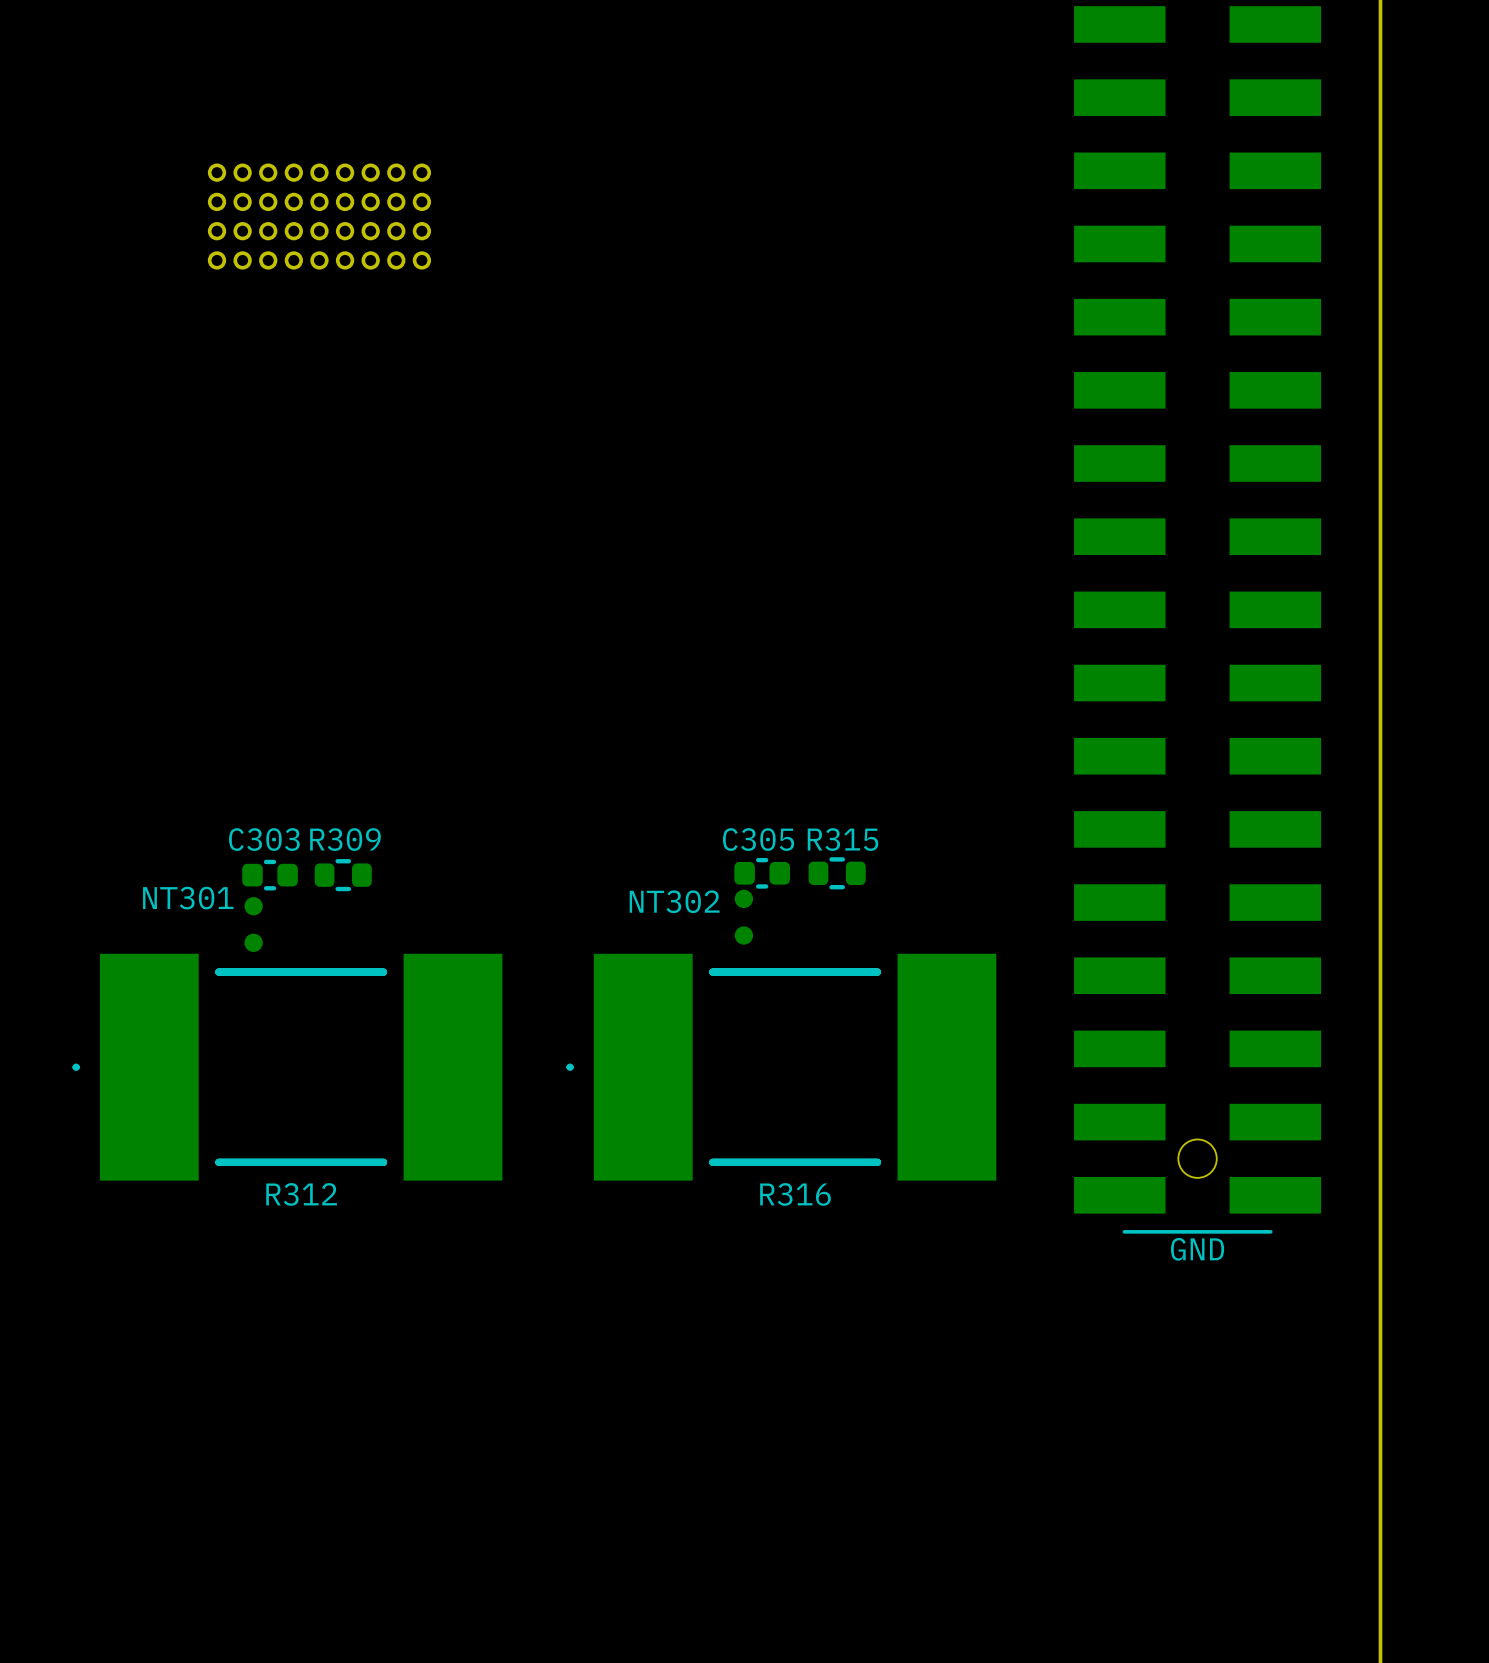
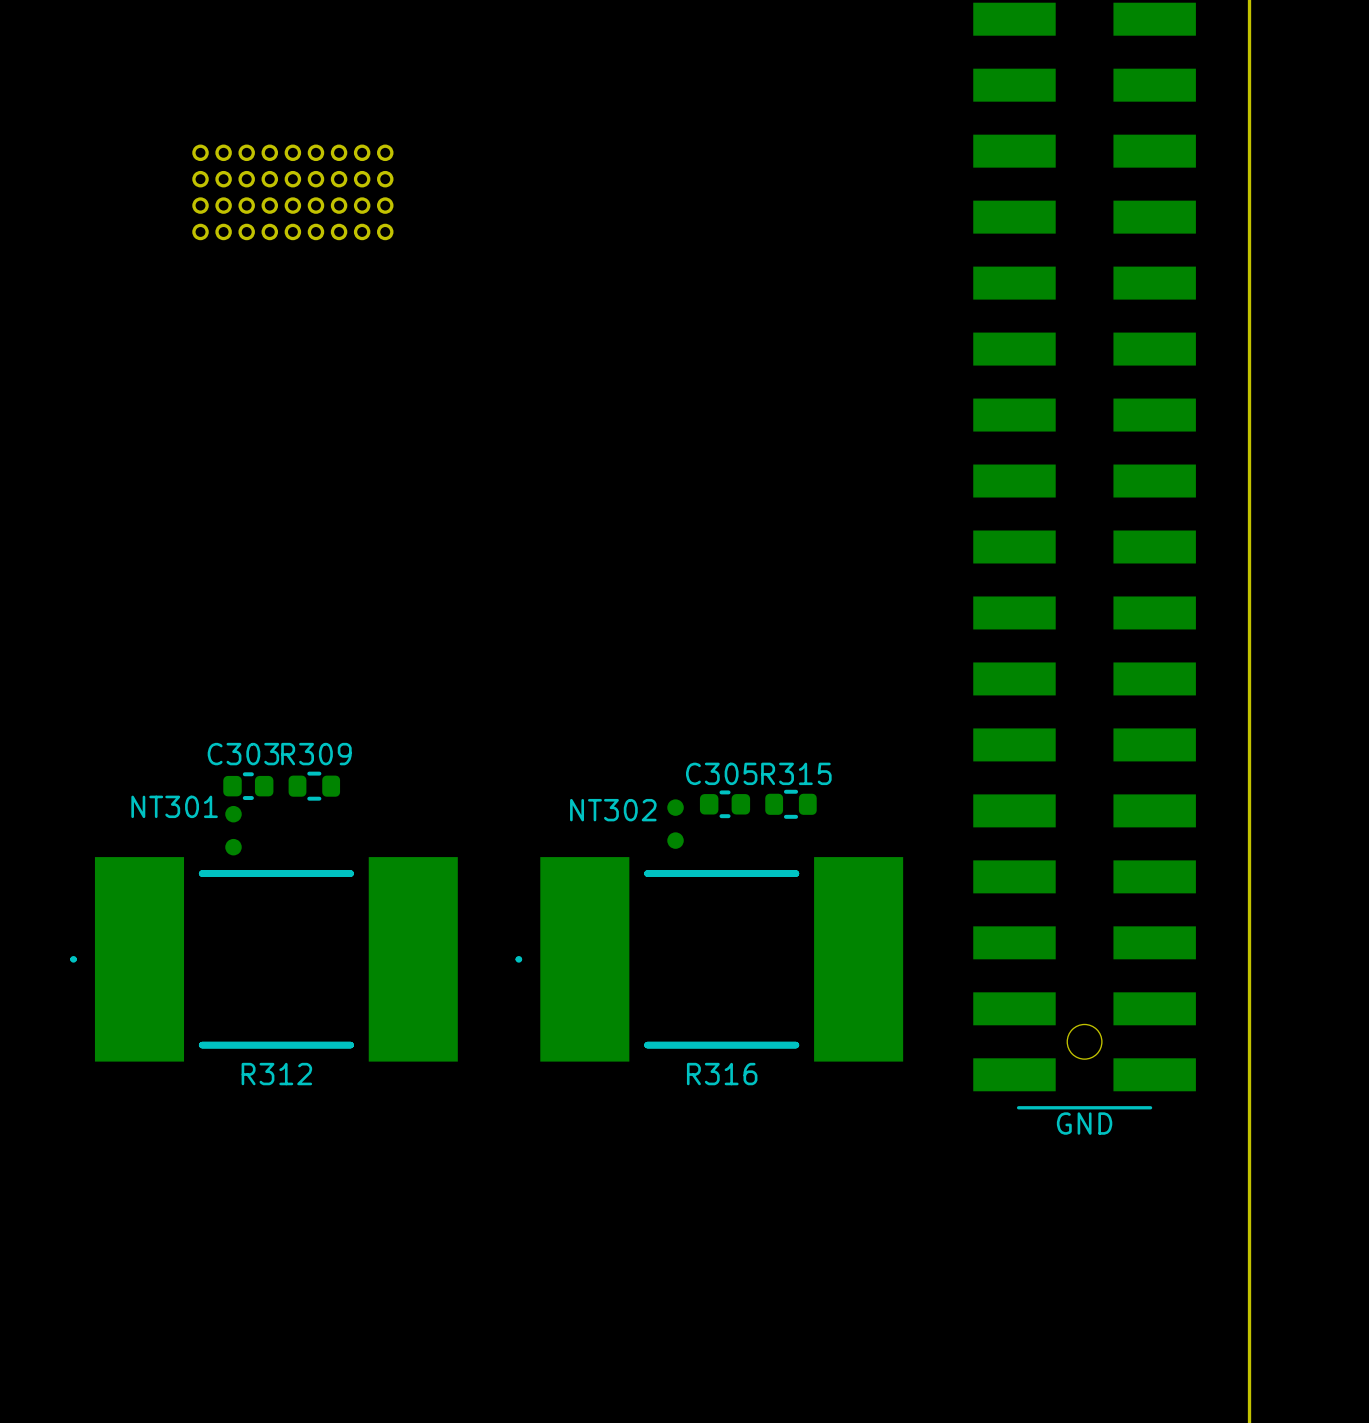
C305 position: (762, 873) -> (725, 804)
R315 position: (837, 873) -> (790, 804)

